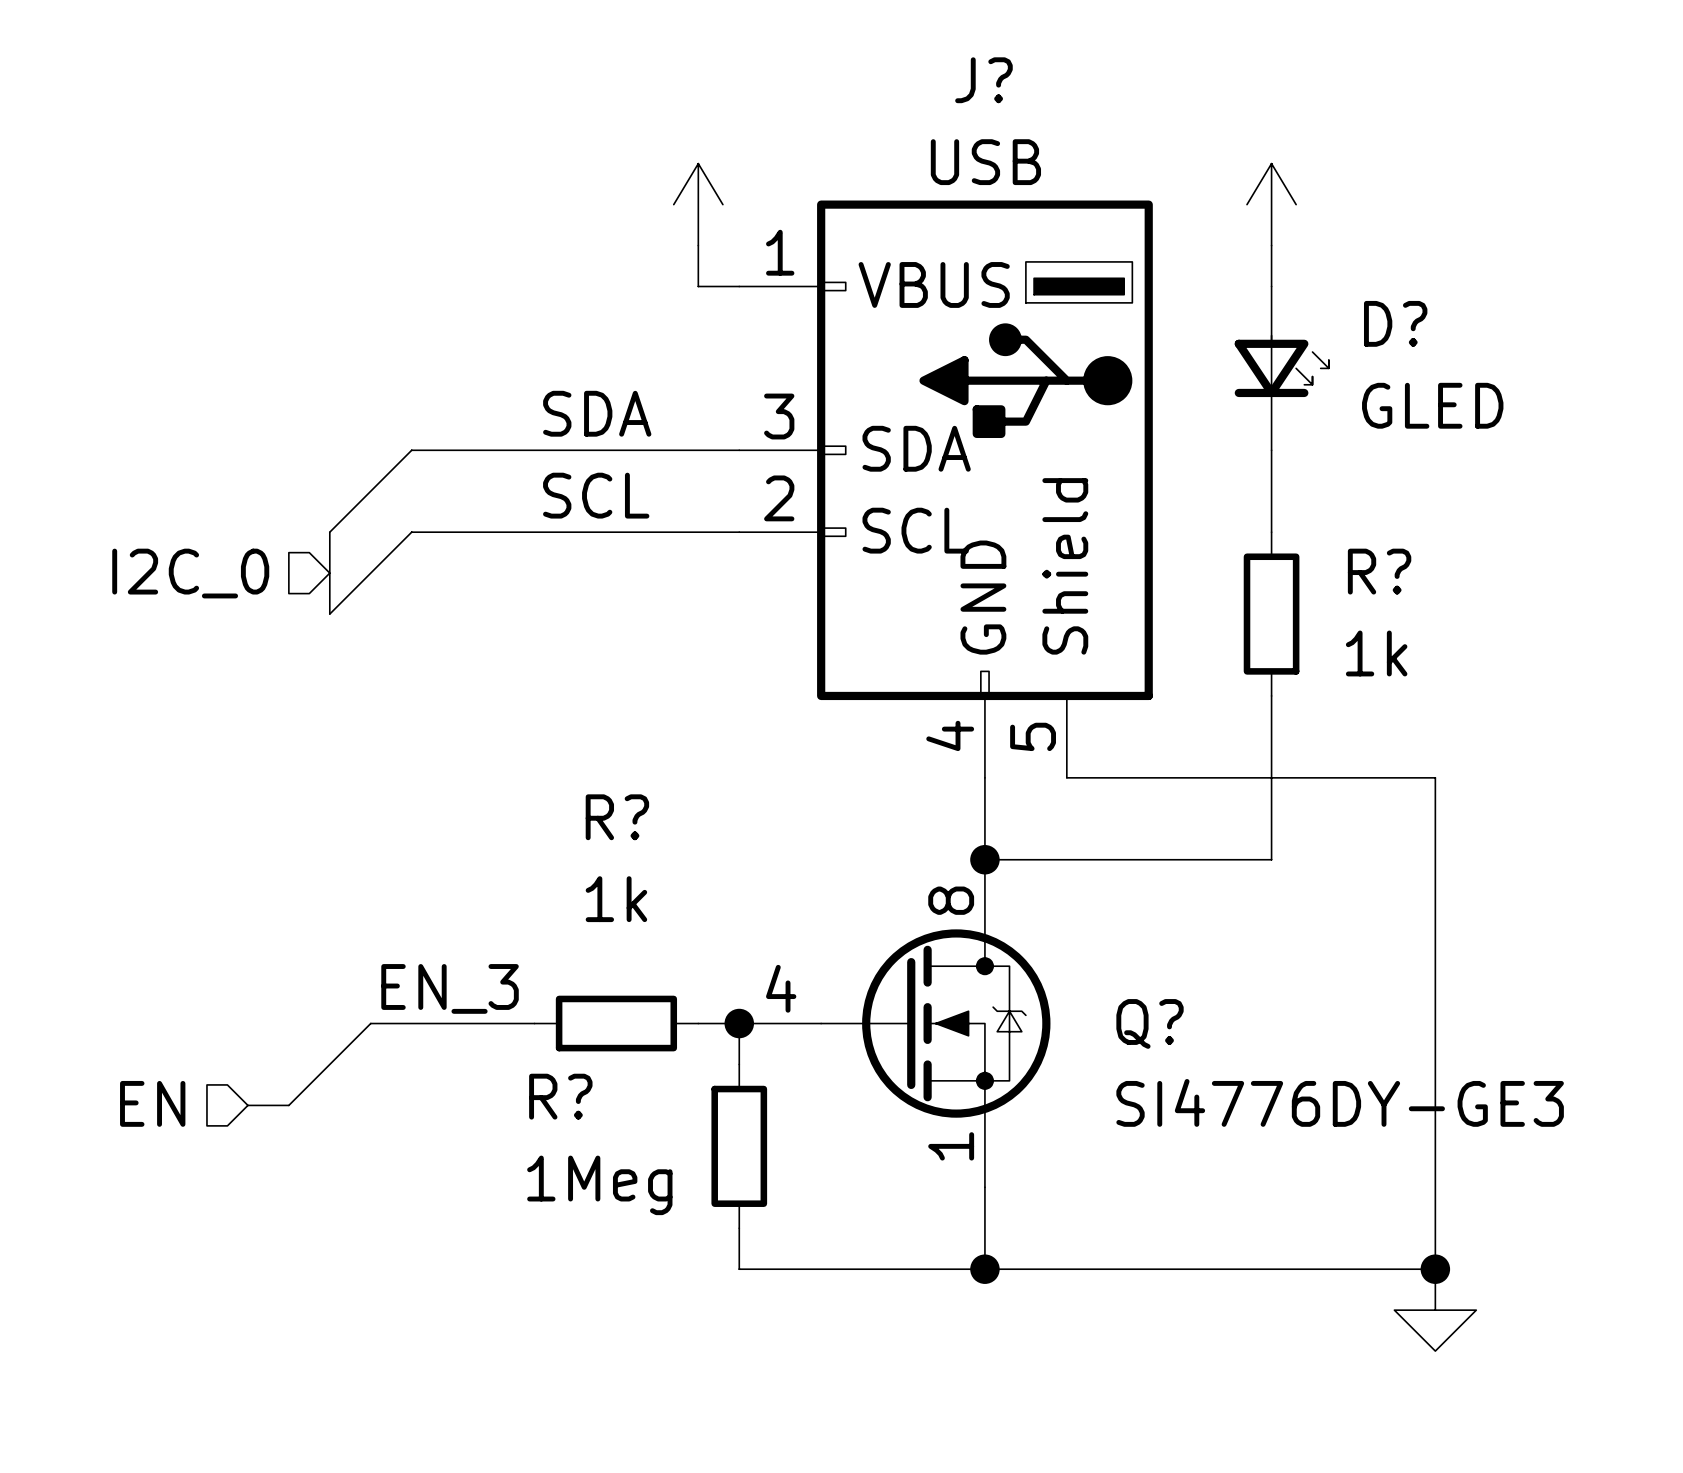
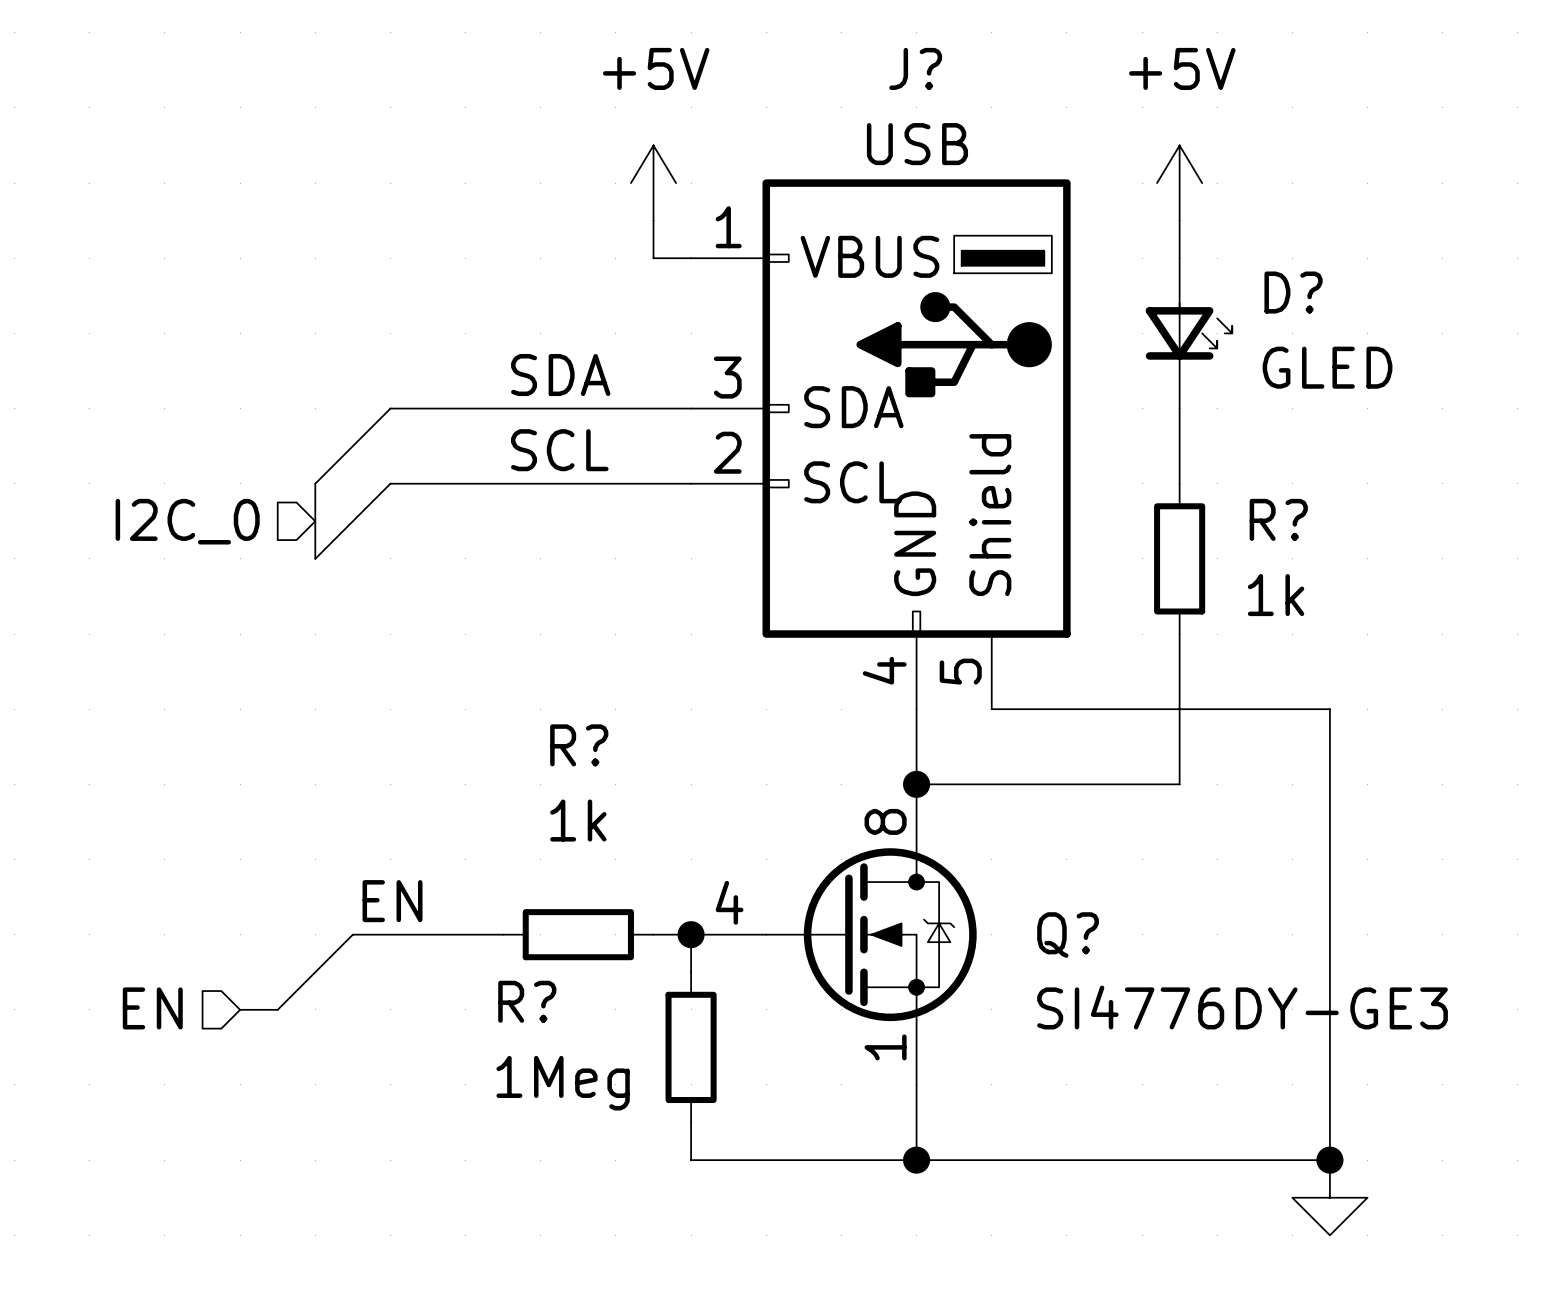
power symbol text: none -> +5V (656, 68)
power symbol text: none -> +5V (1182, 68)
label: EN_3 (450, 988) -> EN (392, 901)

